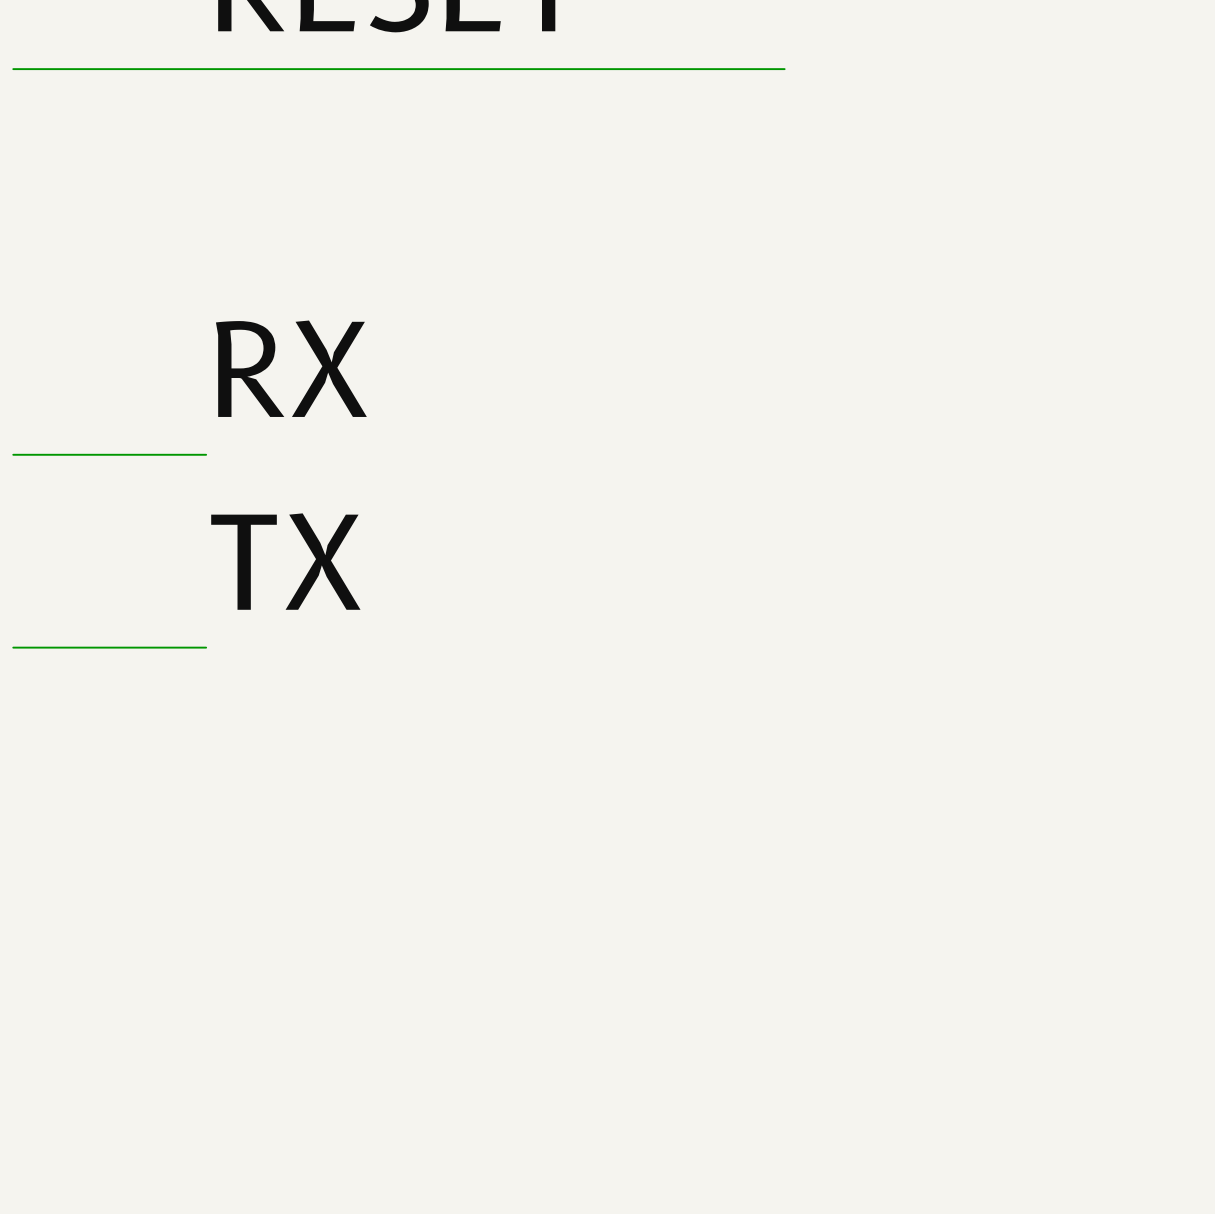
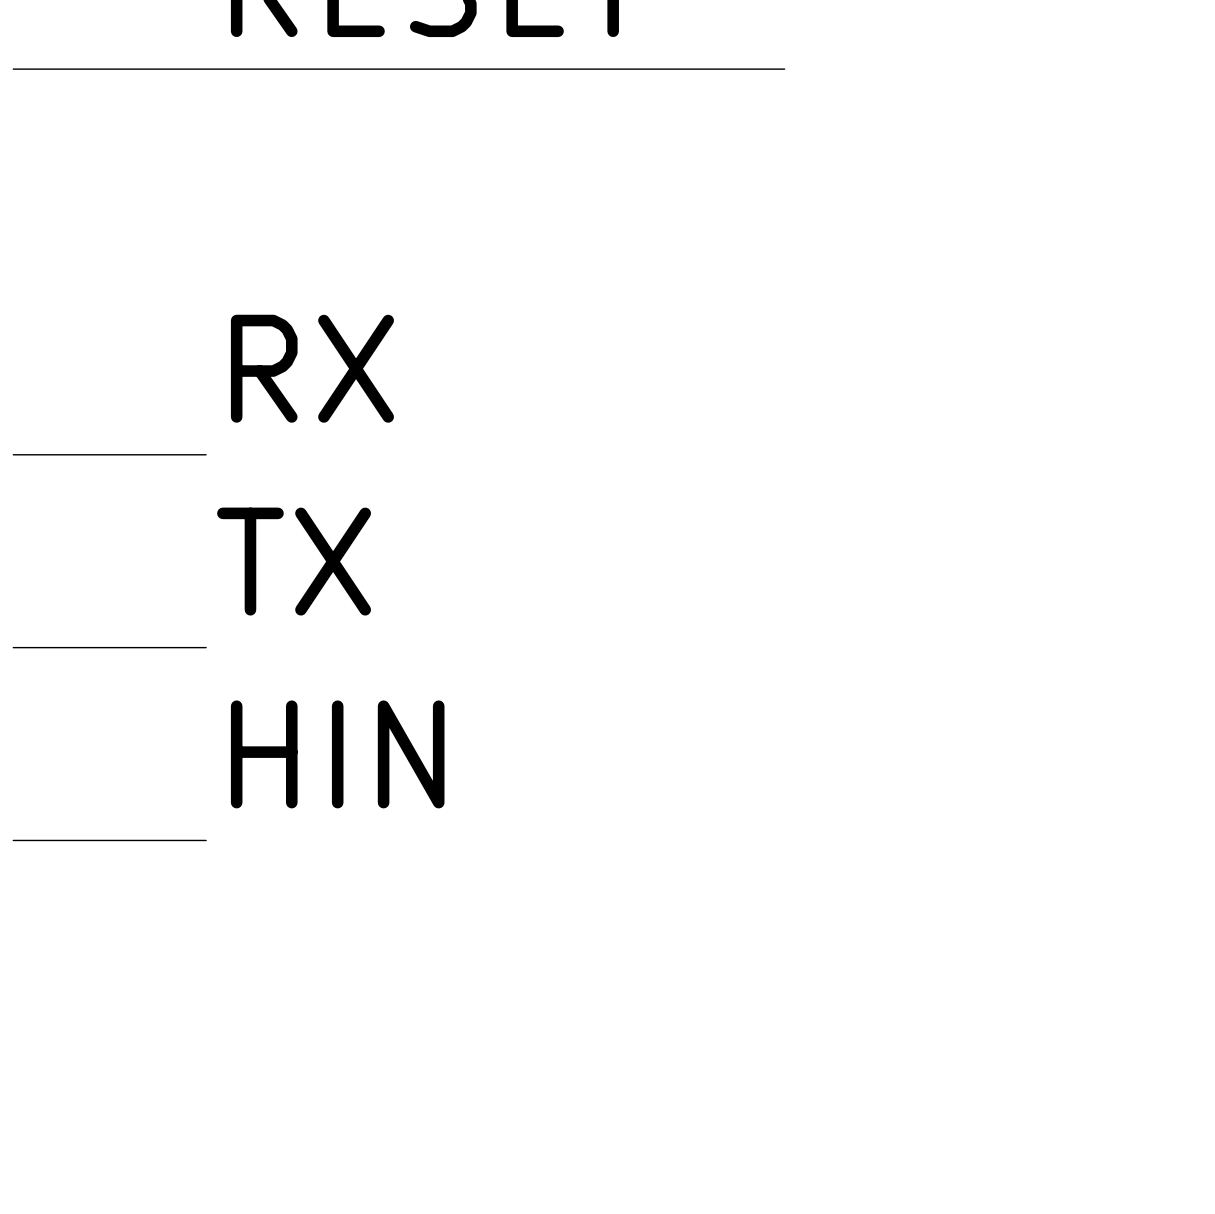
label: none -> HIN (337, 754)
wire: none -> (13, 840) (206, 840)

